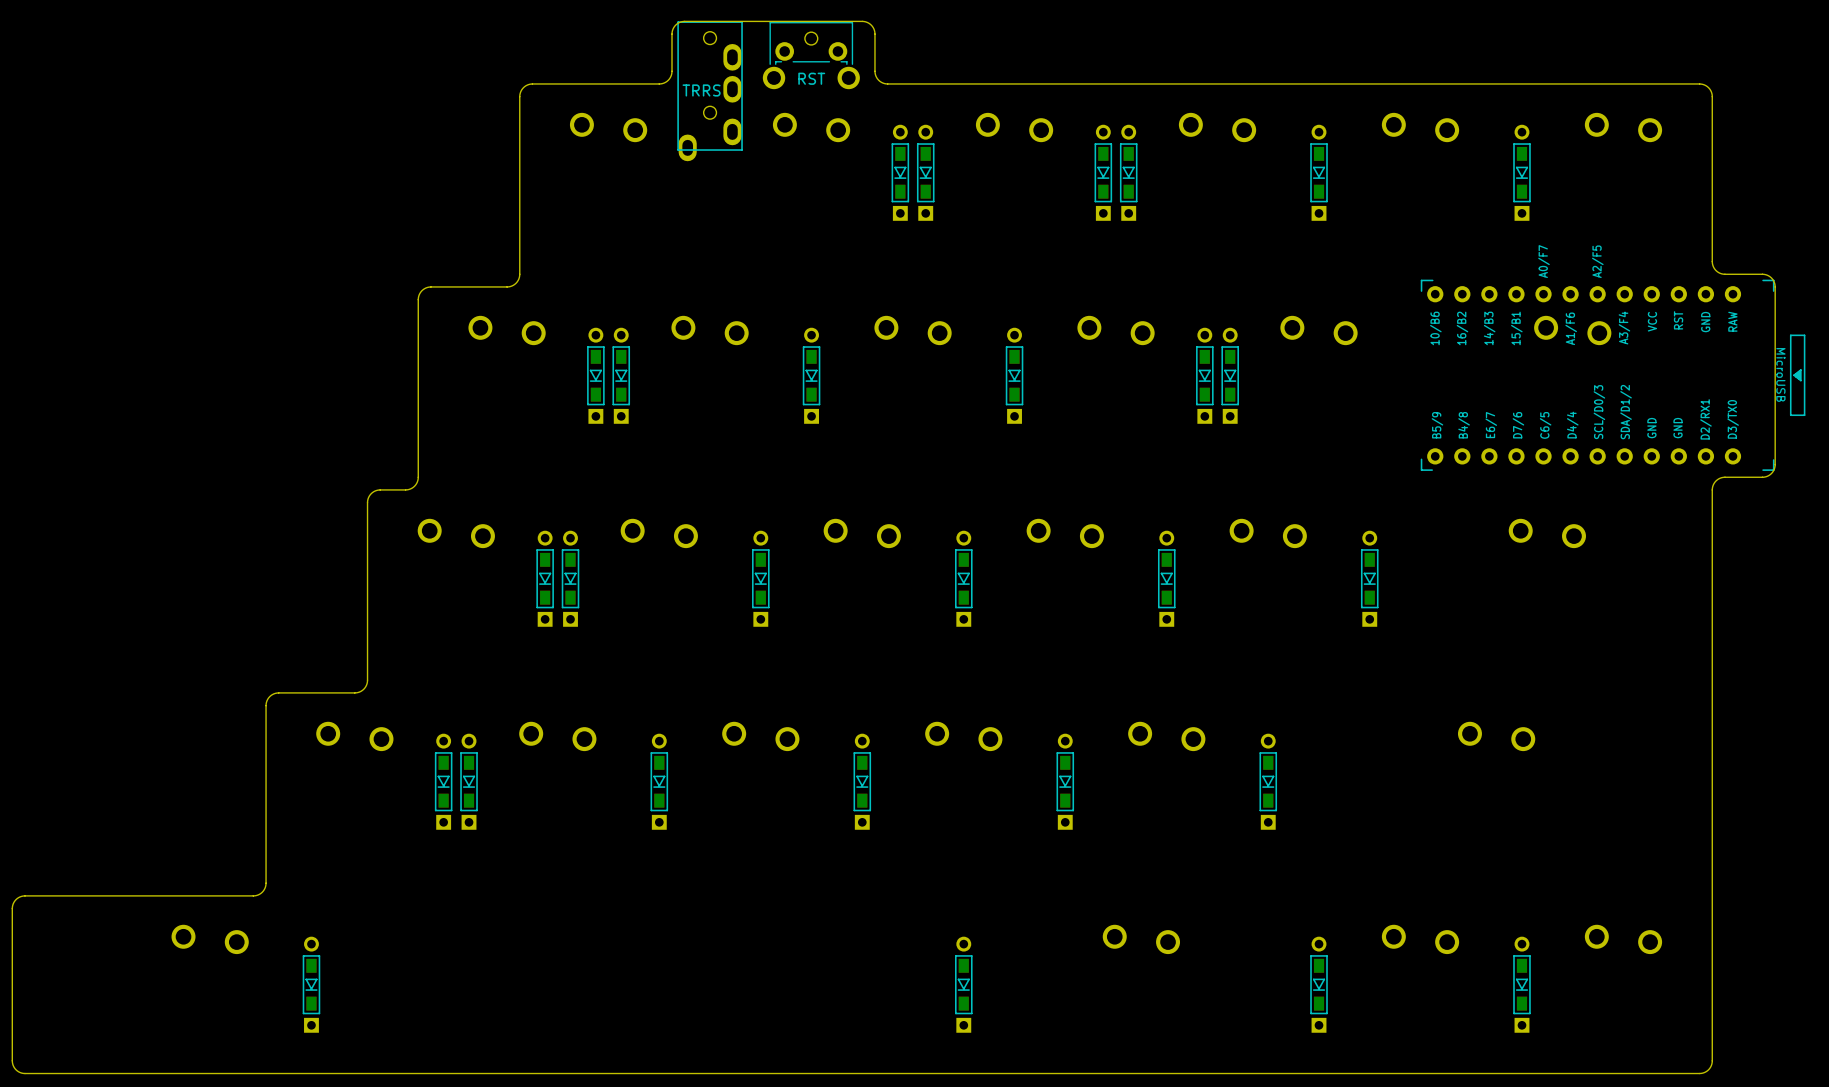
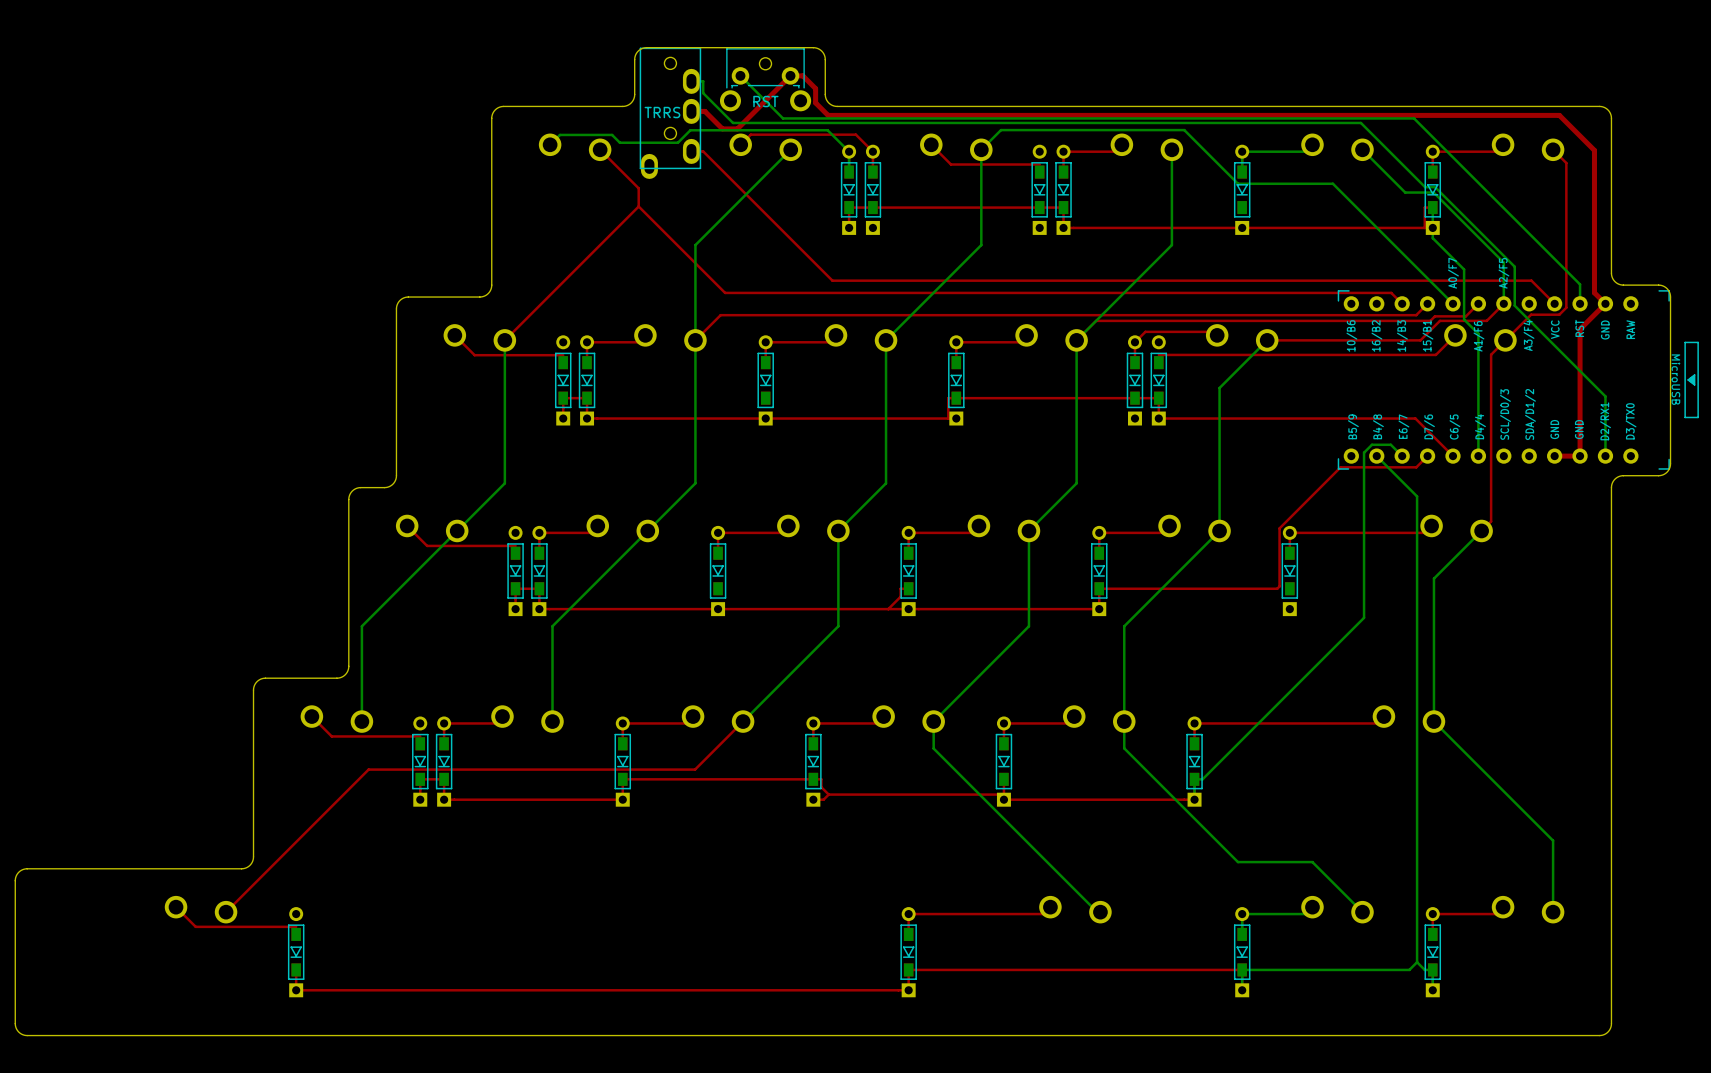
bottom track: none -> (740, 75) (783, 118) (1414, 118) (1580, 284) (1580, 303)
bottom track: none -> (691, 81) (703, 81) (703, 93) (733, 122) (1360, 122) (1425, 187) (1435, 187) (1514, 266) (1514, 305) (1605, 396) (1605, 456)
top track: none -> (691, 111) (704, 111) (722, 128) (737, 128) (790, 75) (802, 75) (815, 88) (815, 102) (828, 115) (1559, 115) (1594, 150) (1594, 292) (1605, 303) (1580, 329) (1580, 456) (1554, 456)
bottom track: none -> (550, 144) (559, 134) (612, 134) (619, 142) (677, 142) (690, 130) (827, 130) (849, 151) (849, 172)
top track: none -> (740, 144) (750, 134) (855, 134) (872, 151) (872, 172)
top track: none -> (931, 144) (951, 164) (1039, 164)
top track: none -> (1121, 144) (1114, 151) (1063, 151) (1063, 172)
bottom track: none -> (1312, 144) (1305, 151) (1242, 151) (1242, 172)
top track: none -> (1503, 144) (1496, 151) (1432, 151) (1432, 172)
top track: none -> (600, 149) (638, 188) (638, 206)
bottom track: none -> (790, 149) (695, 245) (695, 483) (552, 626) (552, 721)
bottom track: none -> (1171, 149) (1171, 245) (1076, 340) (1076, 483) (1028, 530) (1028, 626) (933, 721) (933, 748) (1097, 912) (1100, 912)
bottom track: none -> (1362, 149) (1405, 192) (1433, 192) (1503, 262) (1503, 303)
top track: none -> (1553, 149) (1566, 163) (1566, 307) (1559, 314) (1531, 314) (1491, 354) (1491, 521) (1481, 530)
top track: none -> (691, 151) (703, 151) (832, 280) (1531, 280) (1554, 303)
top track: none -> (638, 206) (725, 292) (1391, 292) (1402, 303)
top track: none -> (638, 206) (504, 340)
top track: none -> (1432, 207) (1424, 207) (1424, 227)
bottom track: none -> (1432, 207) (1432, 238) (1464, 269) (1464, 319) (1478, 333) (1478, 456)
top track: none -> (1432, 227) (1063, 227) (1063, 207) (849, 207) (849, 227)
top track: none -> (1427, 303) (1416, 315) (720, 315) (695, 340)
bottom track: none -> (1453, 303) (1332, 183) (1237, 183) (1184, 130) (1001, 130) (981, 149) (981, 245) (886, 340) (886, 483) (838, 530) (838, 626) (743, 721)
top track: none -> (1478, 303) (1465, 316) (1434, 316) (1430, 320) (1096, 320) (1076, 340)
top track: none -> (1503, 303) (1486, 320) (1439, 320) (1420, 340) (1267, 340)
top track: none -> (454, 335) (474, 355) (563, 355)
top track: none -> (645, 335) (638, 342) (587, 342) (587, 362)
top track: none -> (836, 335) (829, 342) (765, 342) (765, 362)
top track: none -> (1026, 335) (1019, 342) (956, 342) (956, 362)
top track: none -> (1217, 335) (1213, 331) (1145, 331) (1134, 342) (1134, 362)
top track: none -> (1455, 335) (1435, 354) (1158, 354)
bottom track: none -> (504, 340) (504, 483) (361, 626) (361, 721)
bottom track: none -> (1267, 340) (1219, 388) (1219, 530) (1124, 626) (1124, 748) (1237, 862) (1312, 862) (1362, 912)
top track: none -> (948, 418) (948, 398) (1158, 398) (1158, 418) (1415, 418) (1453, 456)
top track: none -> (956, 418) (587, 418) (587, 398) (563, 398) (563, 418)
bottom track: none -> (1376, 456) (1417, 496) (1417, 962)
bottom track: none -> (1402, 456) (1390, 444) (1371, 444) (1364, 452) (1364, 617) (1202, 779) (1194, 779) (1194, 799)
top track: none -> (1427, 456) (1416, 467) (1340, 467) (1279, 528) (1279, 586) (1277, 588) (1099, 588) (1099, 609) (539, 609) (539, 588) (515, 588) (515, 609)
top track: none -> (407, 525) (427, 545) (515, 545)
top track: none -> (597, 525) (590, 532) (539, 532) (539, 553)
top track: none -> (788, 525) (781, 532) (718, 532) (718, 553)
top track: none -> (978, 525) (972, 532) (908, 532) (908, 553)
top track: none -> (1169, 525) (1162, 532) (1099, 532) (1099, 553)
top track: none -> (1431, 525) (1424, 532) (1289, 532) (1289, 553)
bottom track: none -> (1481, 530) (1433, 578) (1433, 721) (1553, 840) (1553, 912)
top track: none -> (908, 588) (900, 588) (900, 596) (888, 609)
top track: none -> (311, 716) (331, 736) (420, 736)
top track: none -> (502, 716) (495, 723) (444, 723) (444, 743)
top track: none -> (693, 716) (686, 723) (622, 723) (622, 743)
top track: none -> (883, 716) (876, 723) (813, 723) (813, 743)
top track: none -> (1074, 716) (1067, 723) (1003, 723) (1003, 743)
top track: none -> (1383, 716) (1377, 723) (1194, 723) (1194, 743)
top track: none -> (743, 721) (695, 769) (368, 769) (226, 912)
top track: none -> (1003, 779) (1003, 799) (1194, 799)
top track: none -> (828, 794) (821, 787) (821, 779) (622, 779) (622, 799) (444, 799) (444, 779) (420, 779) (420, 799)
top track: none -> (828, 794) (823, 799) (813, 799)
top track: none -> (1003, 794) (828, 794)
top track: none -> (176, 907) (195, 926) (296, 926)
top track: none -> (1050, 907) (1043, 914) (908, 914) (908, 934)
bottom track: none -> (1312, 907) (1305, 914) (1242, 914) (1242, 934)
top track: none -> (1503, 907) (1496, 914) (1432, 914) (1432, 934)
bottom track: none -> (1417, 962) (1409, 969) (1242, 969) (1242, 990)
bottom track: none -> (1417, 962) (1424, 969) (1432, 969) (1432, 990)
top track: none -> (296, 969) (296, 990) (908, 990)
top track: none -> (1242, 969) (908, 969) (908, 985) (903, 990)

